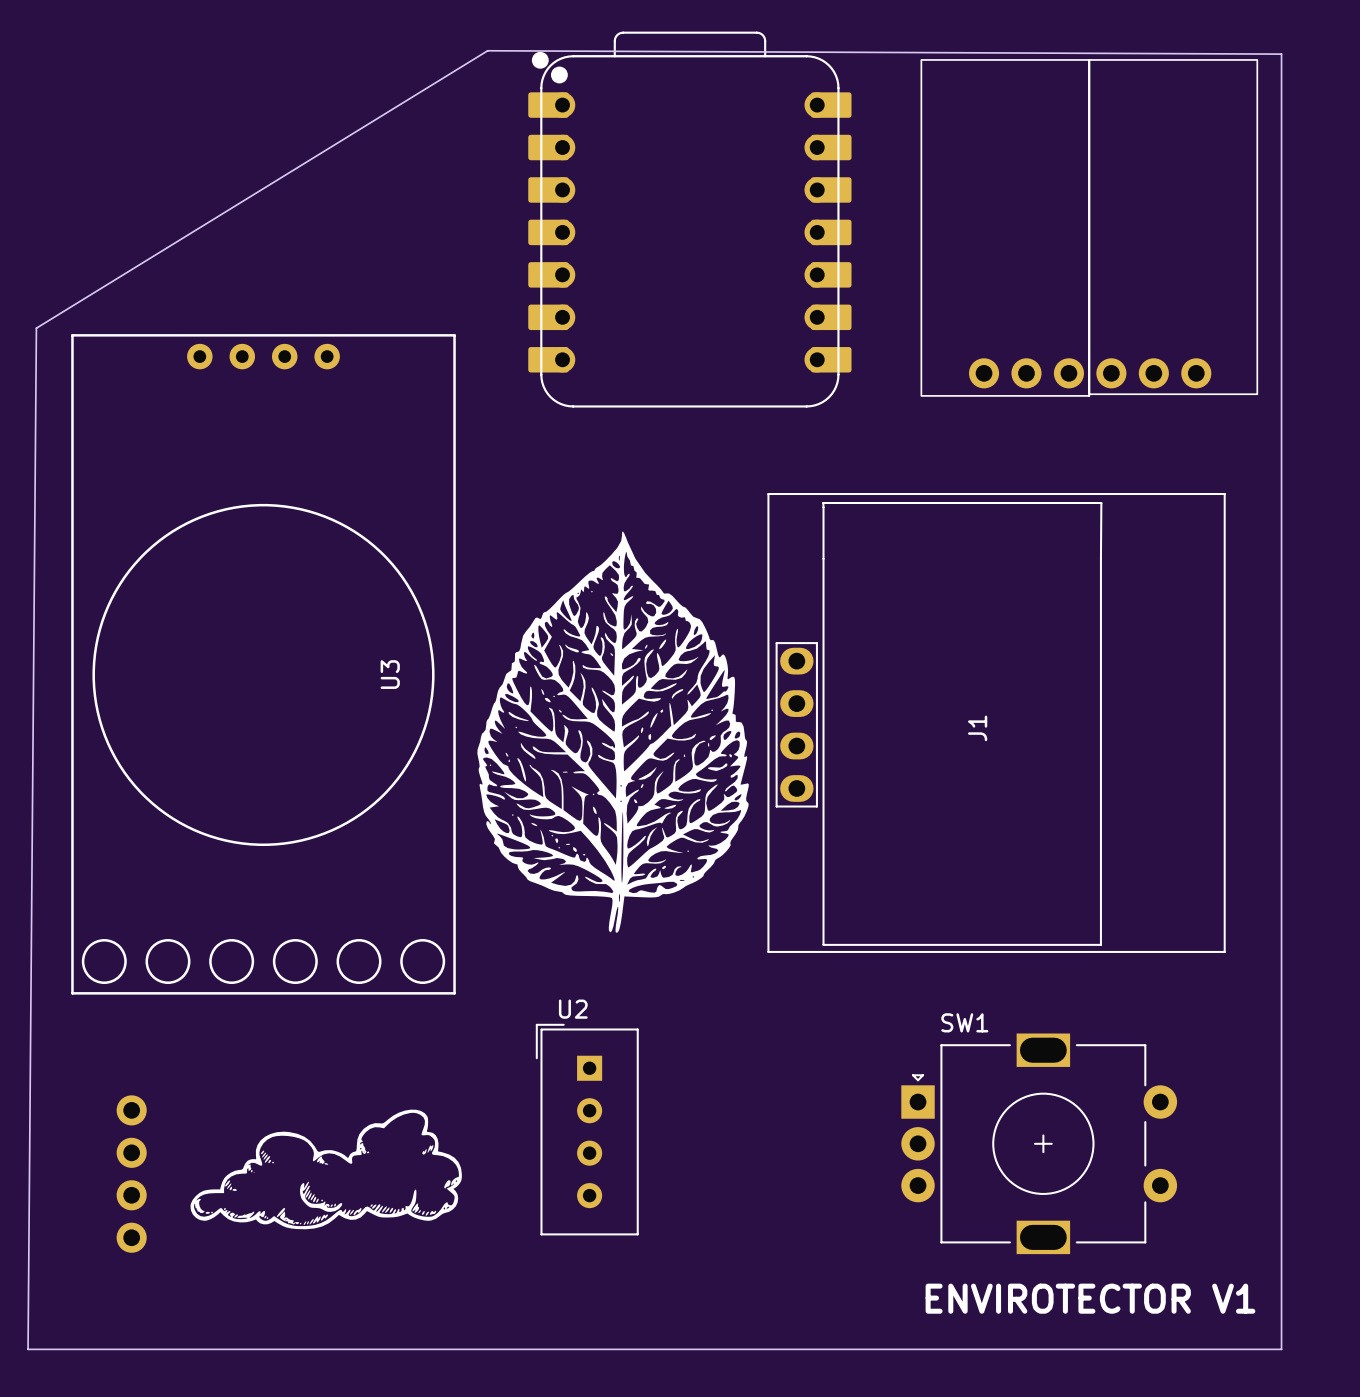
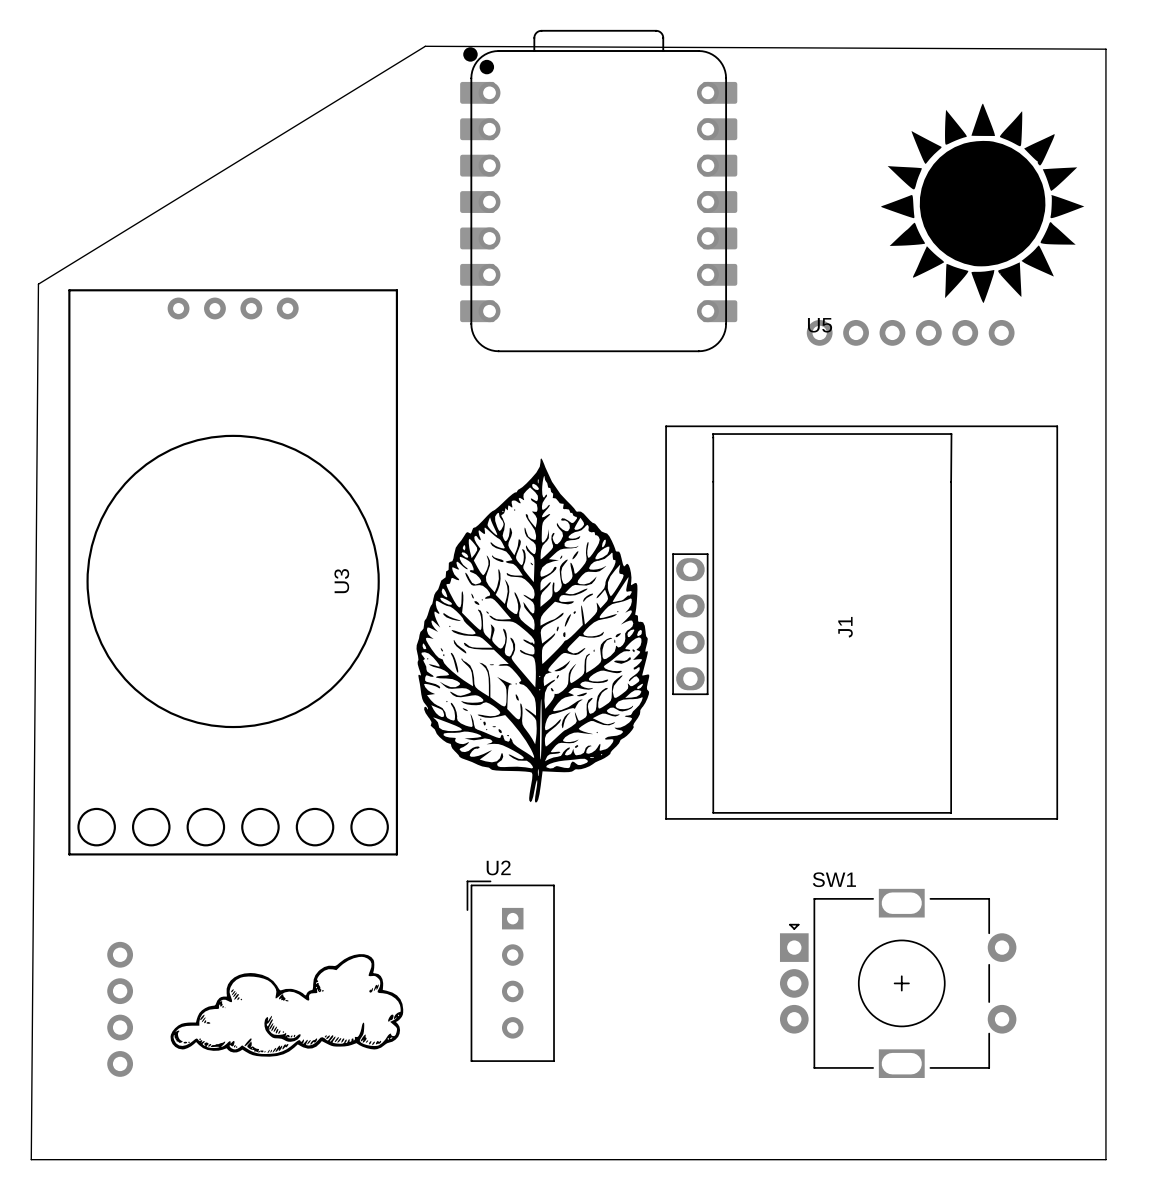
part: (1089, 227) -> none
part: none -> (982, 203)
U5: none -> (910, 332)
text: ENVIROTECTOR V1 (1090, 1298) -> none

